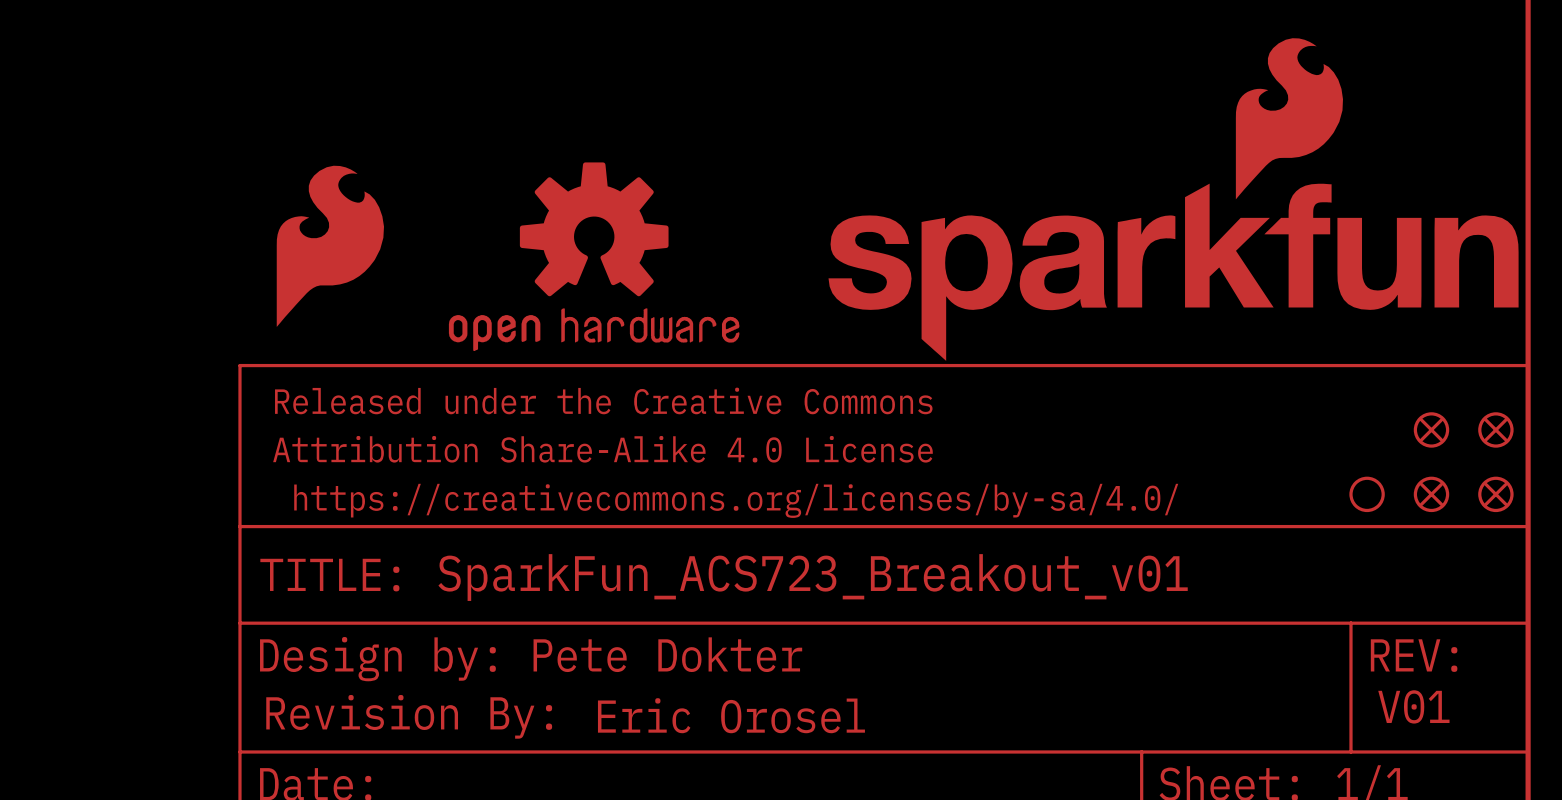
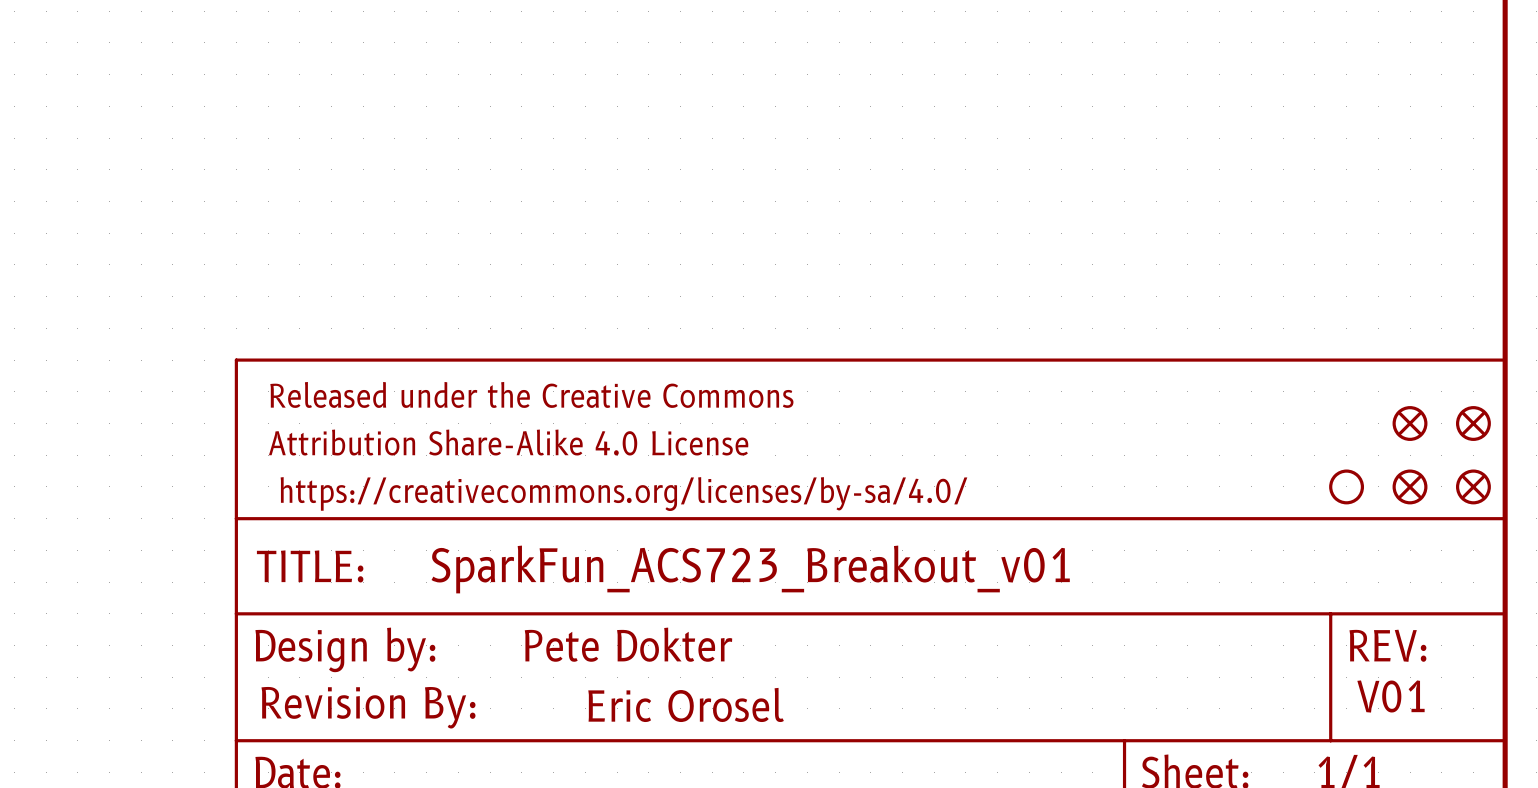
part: (1173, 199) -> none
part: (330, 246) -> none
part: (594, 256) -> none

